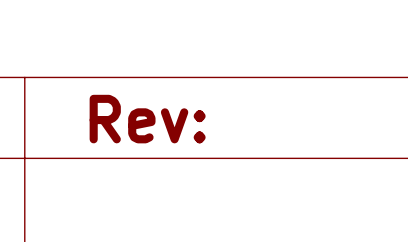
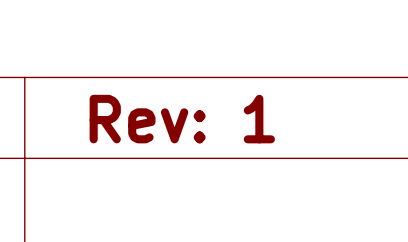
title block: Rev: (147, 119) -> Rev: 1 (182, 119)

